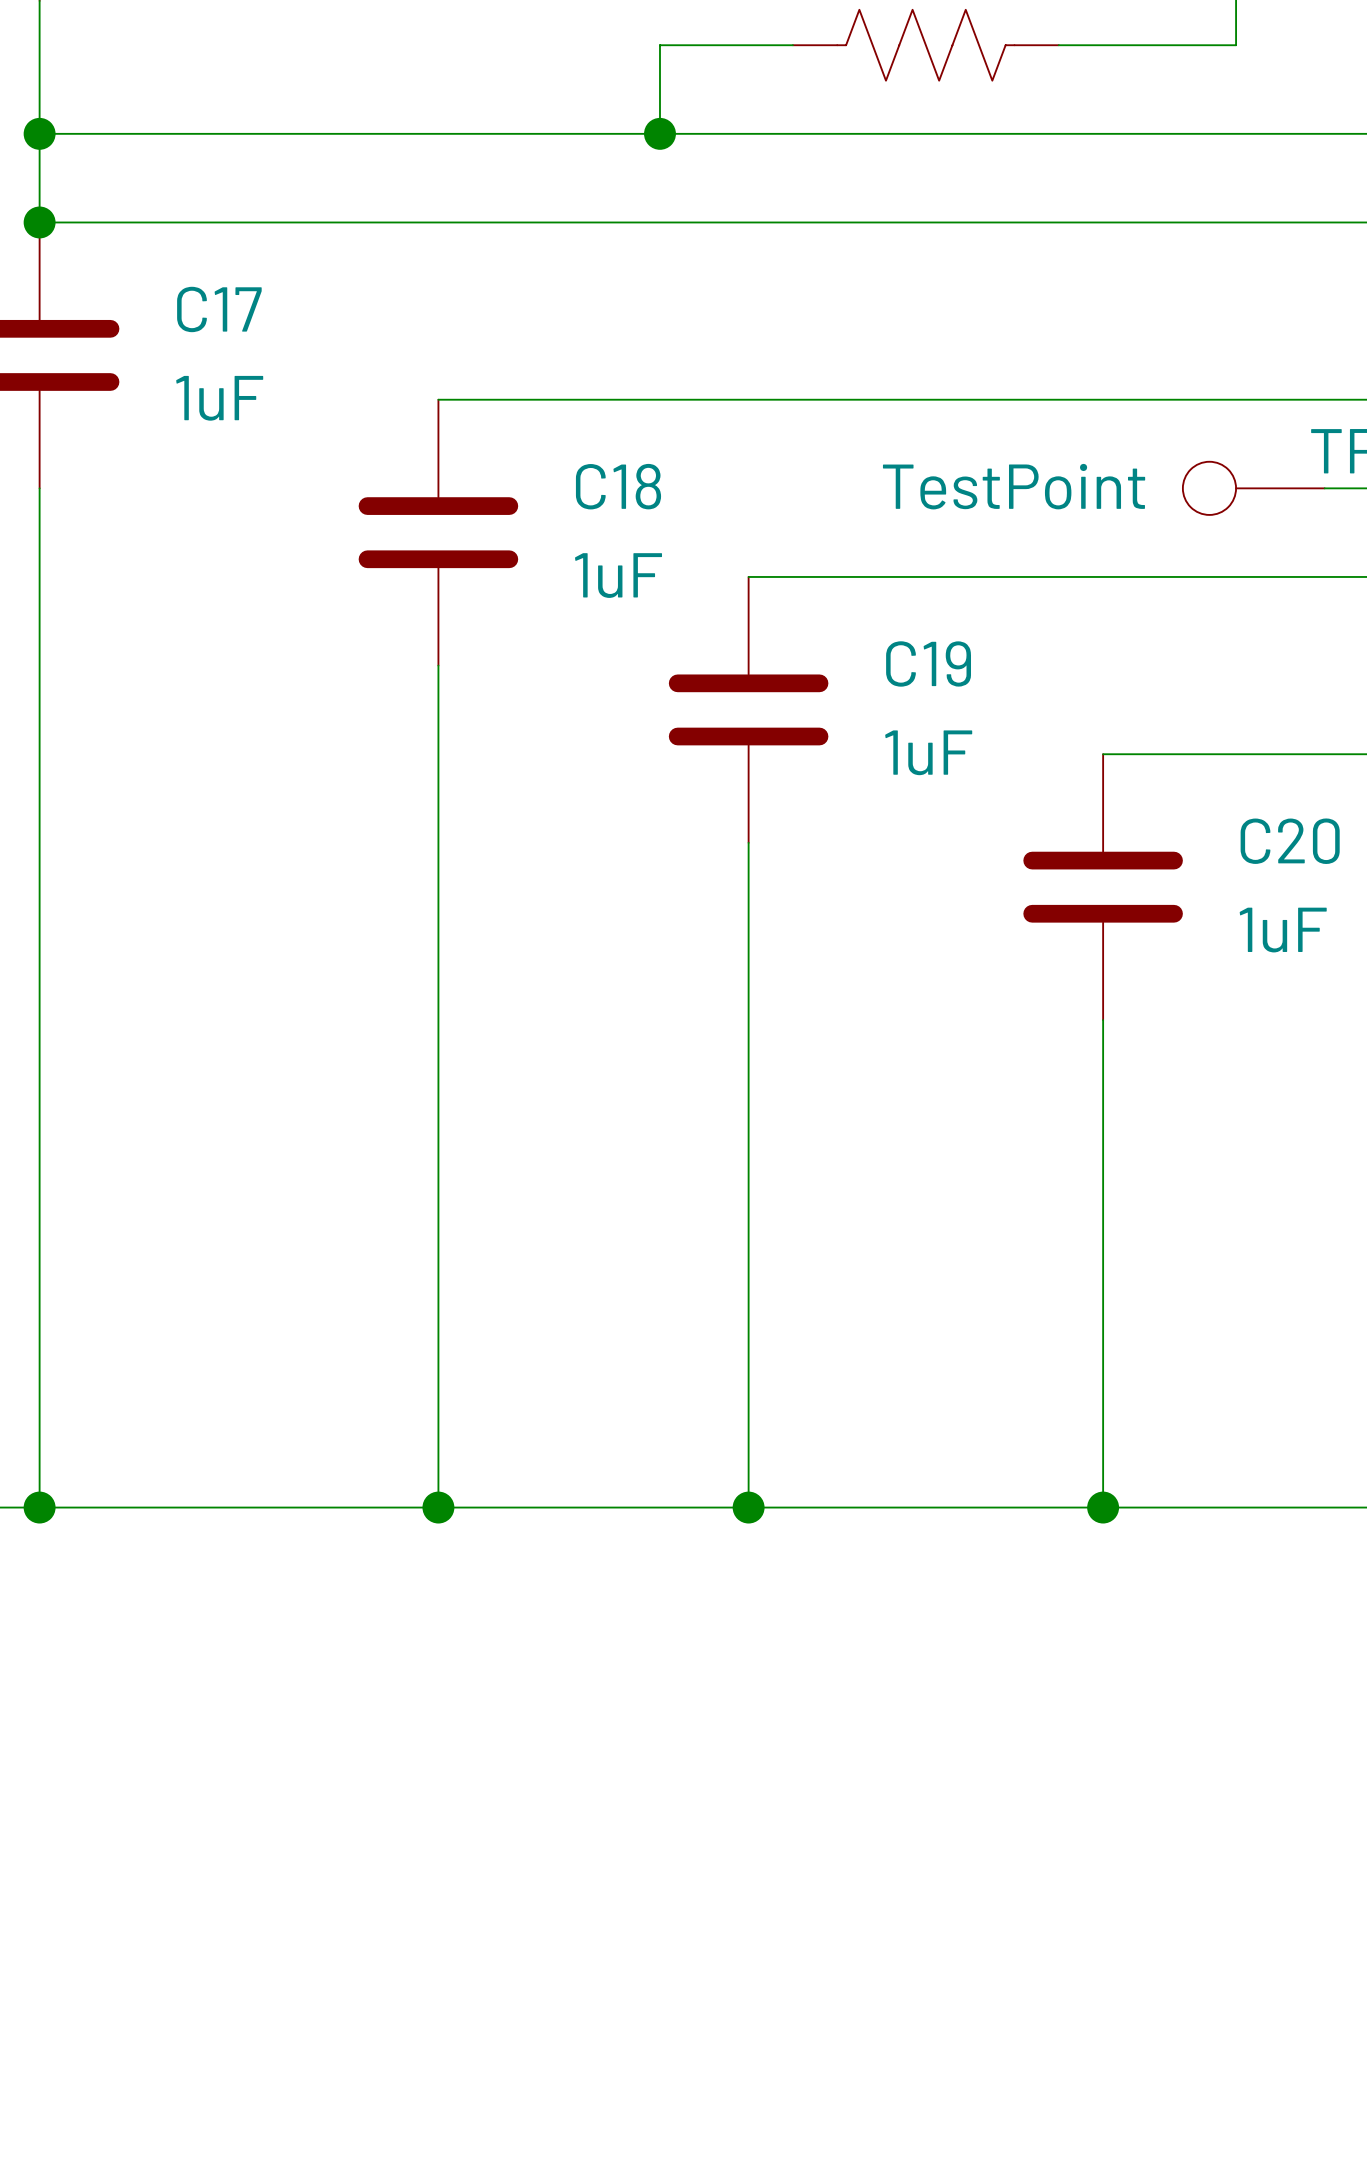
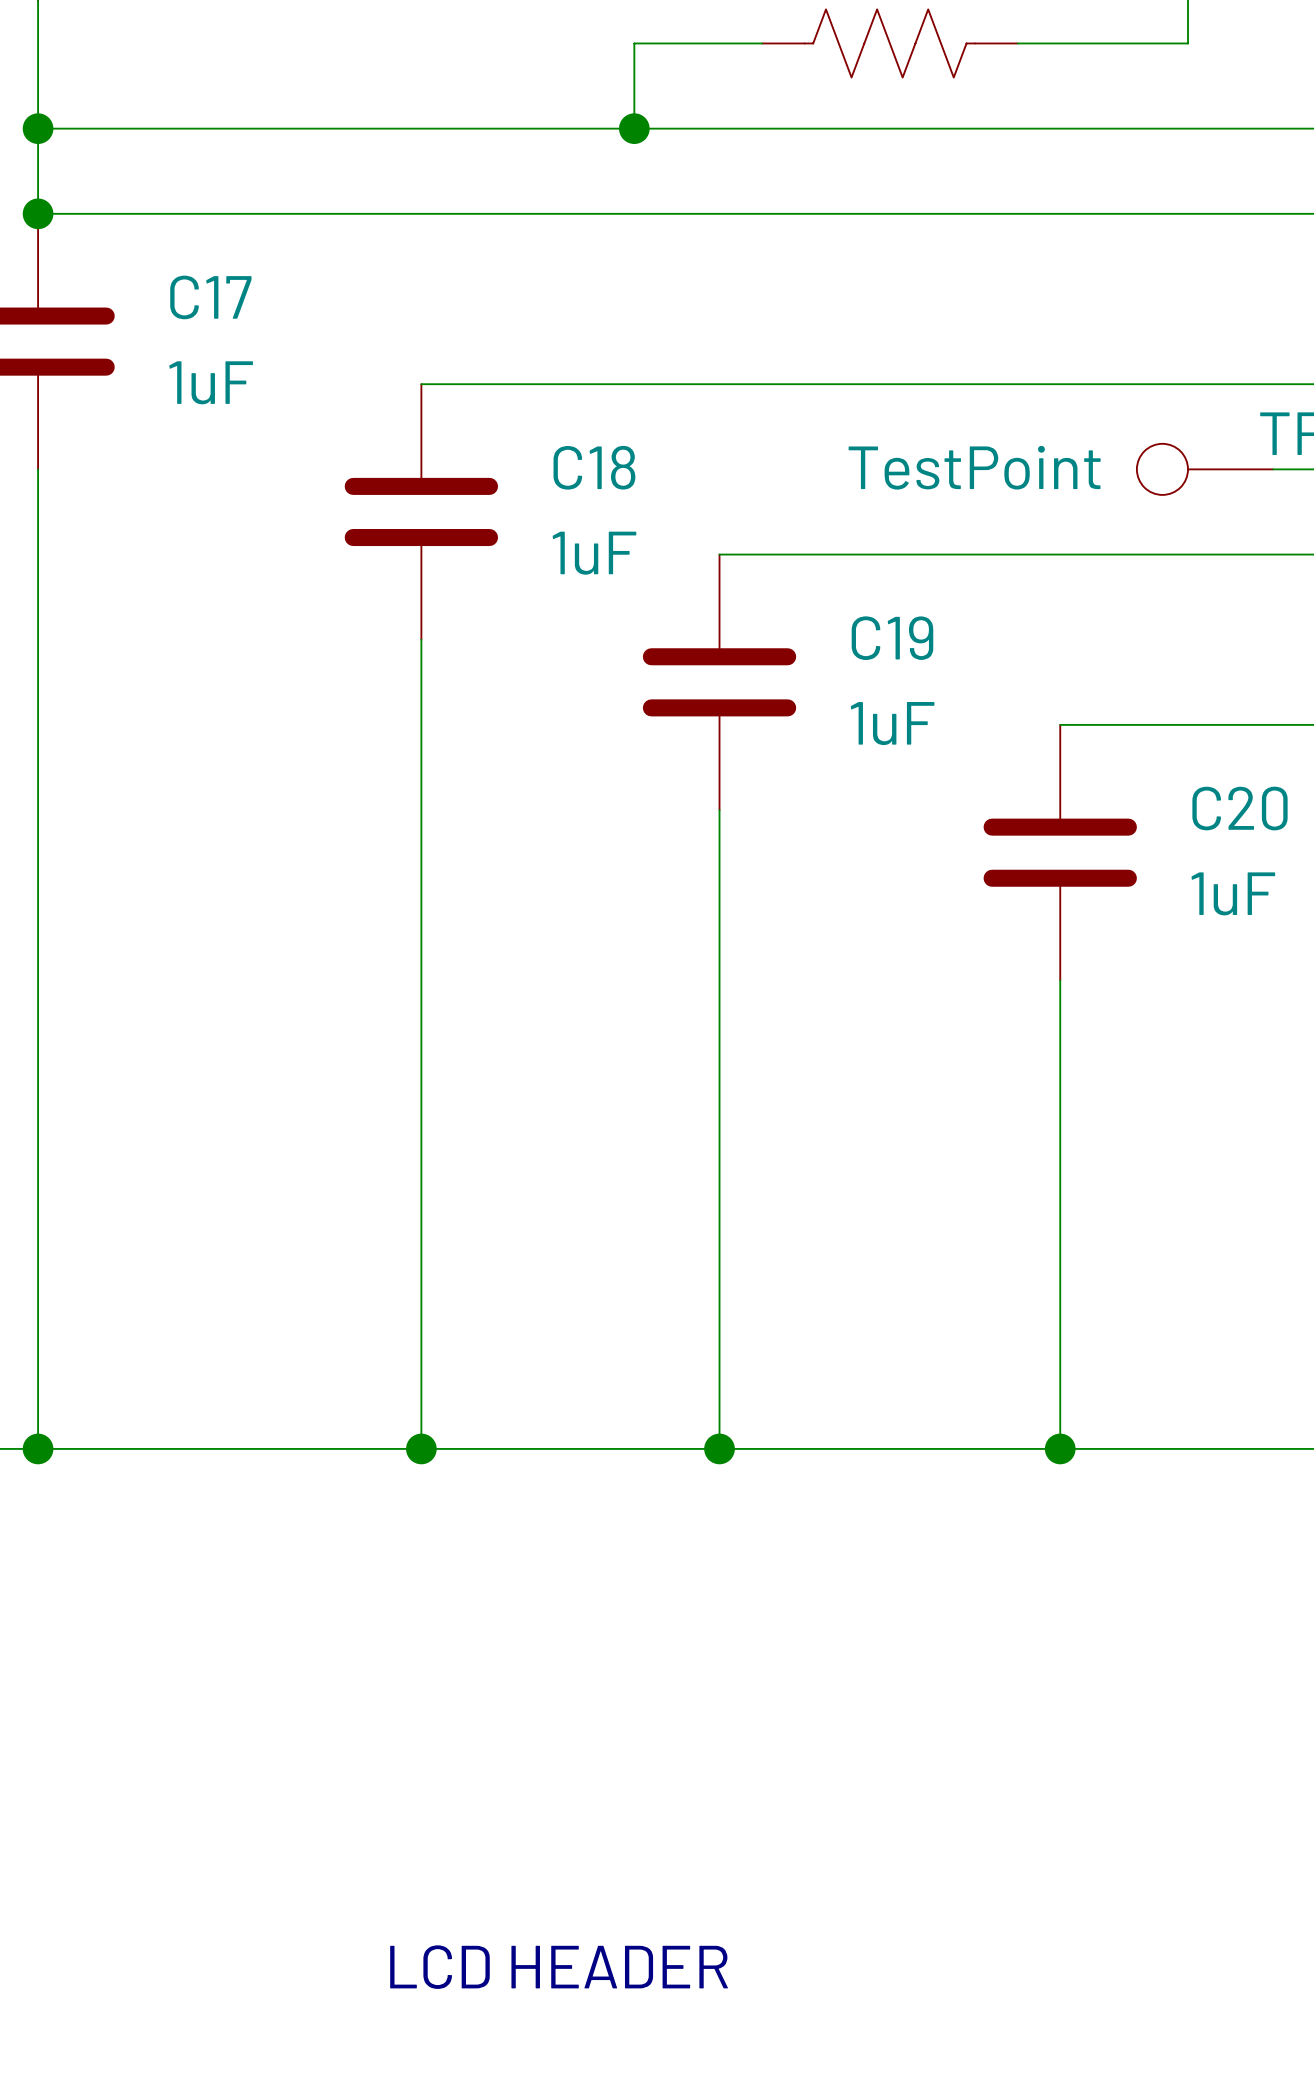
text: none -> LCD HEADER (559, 1967)

